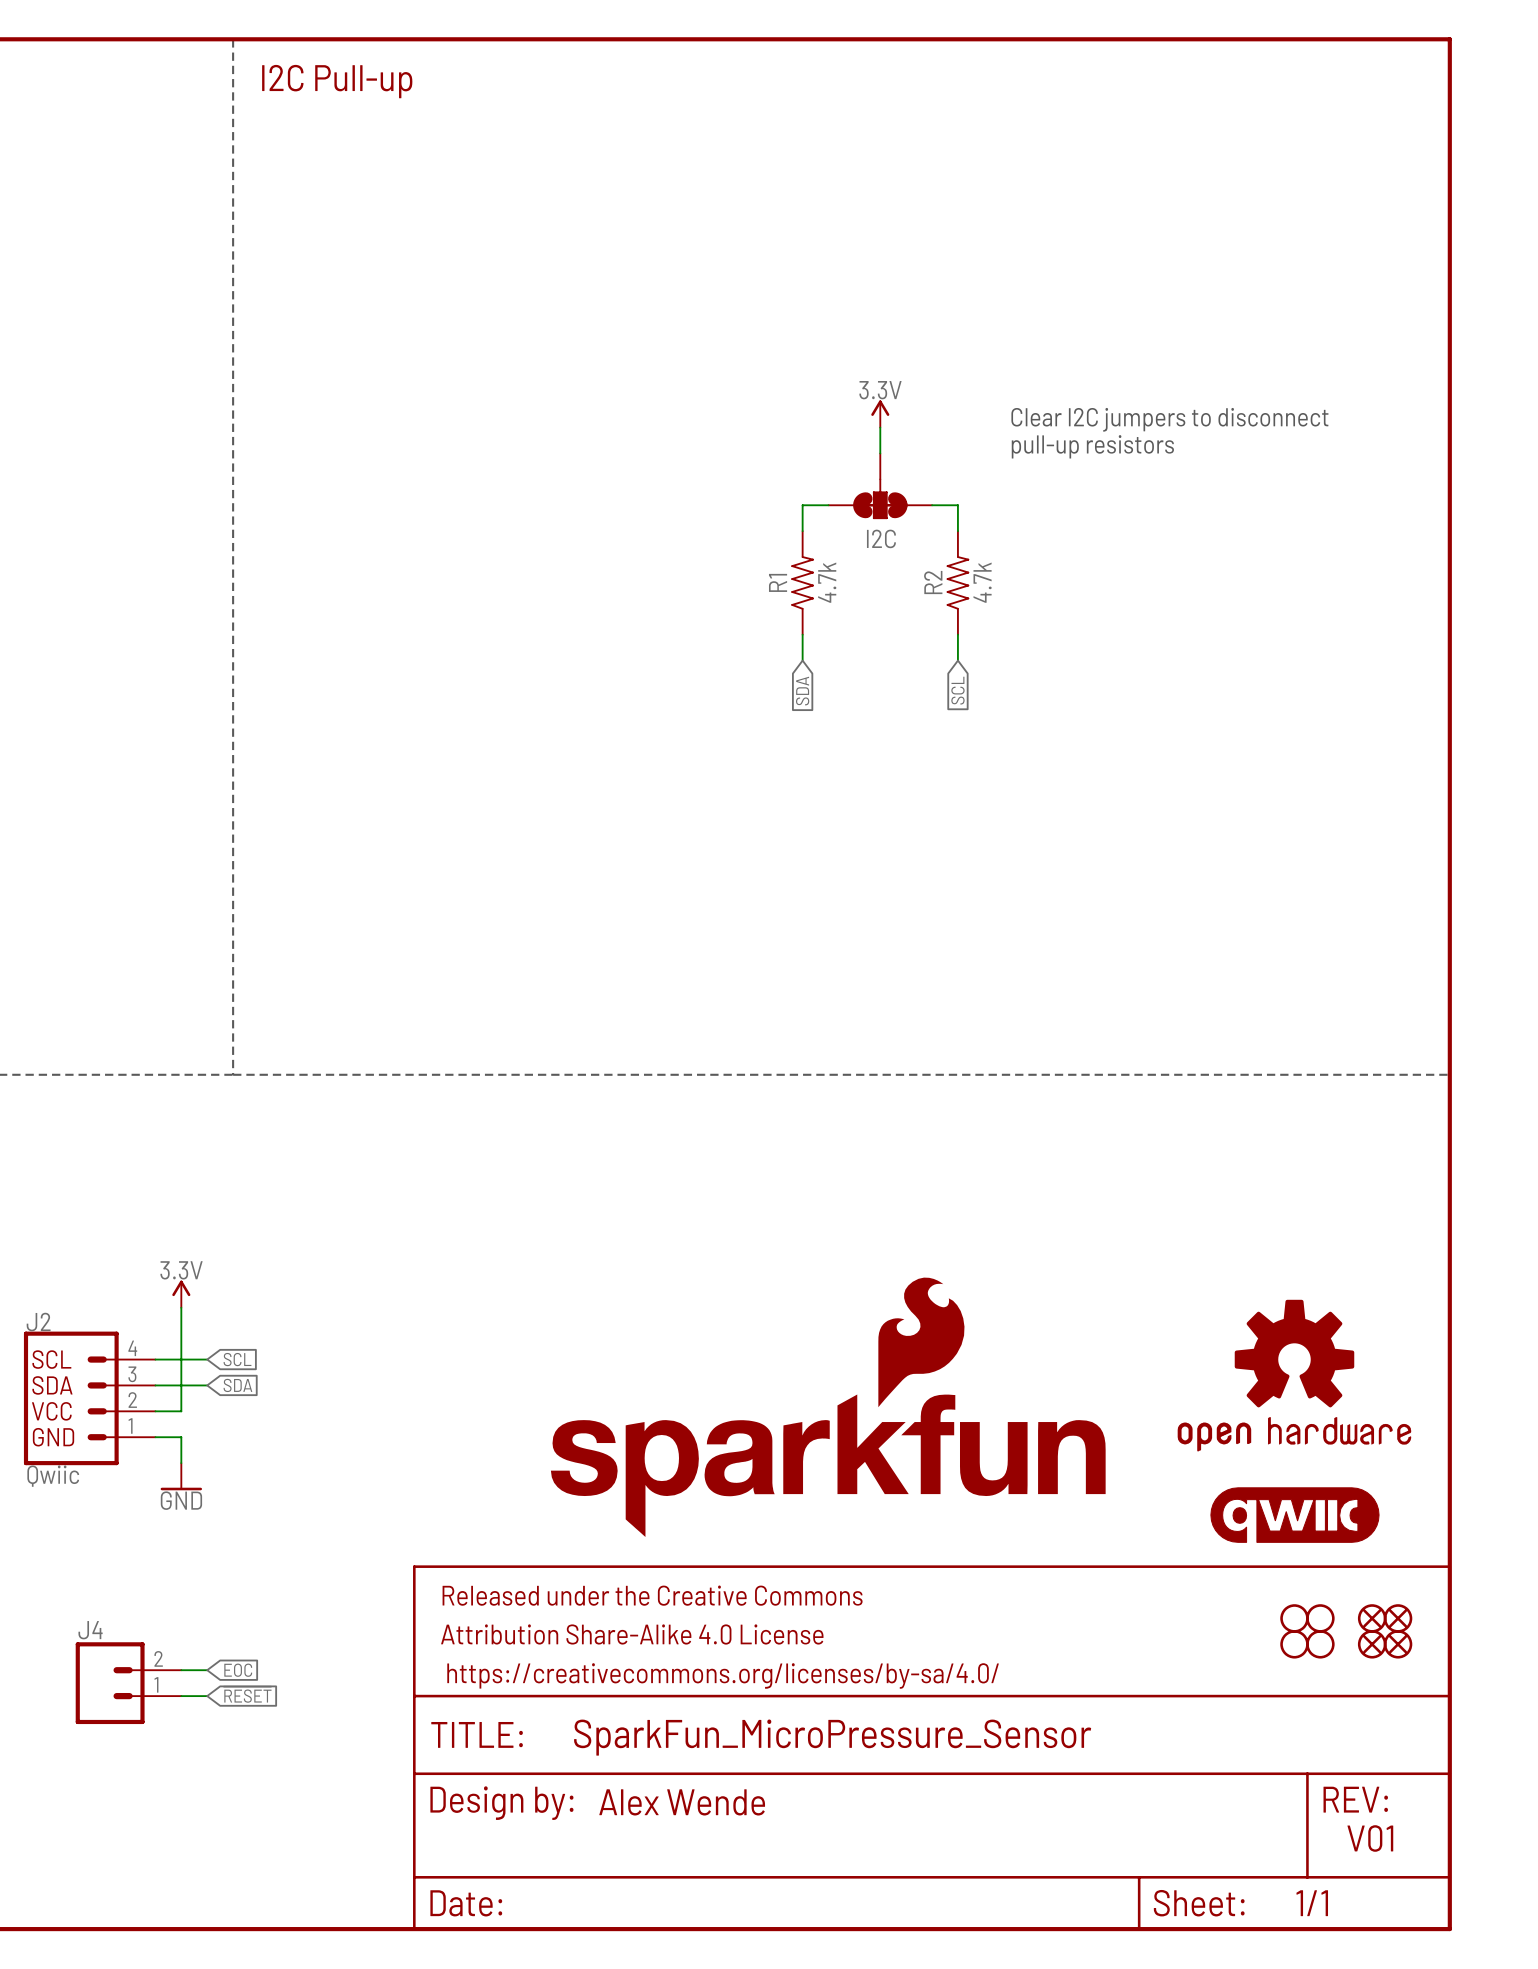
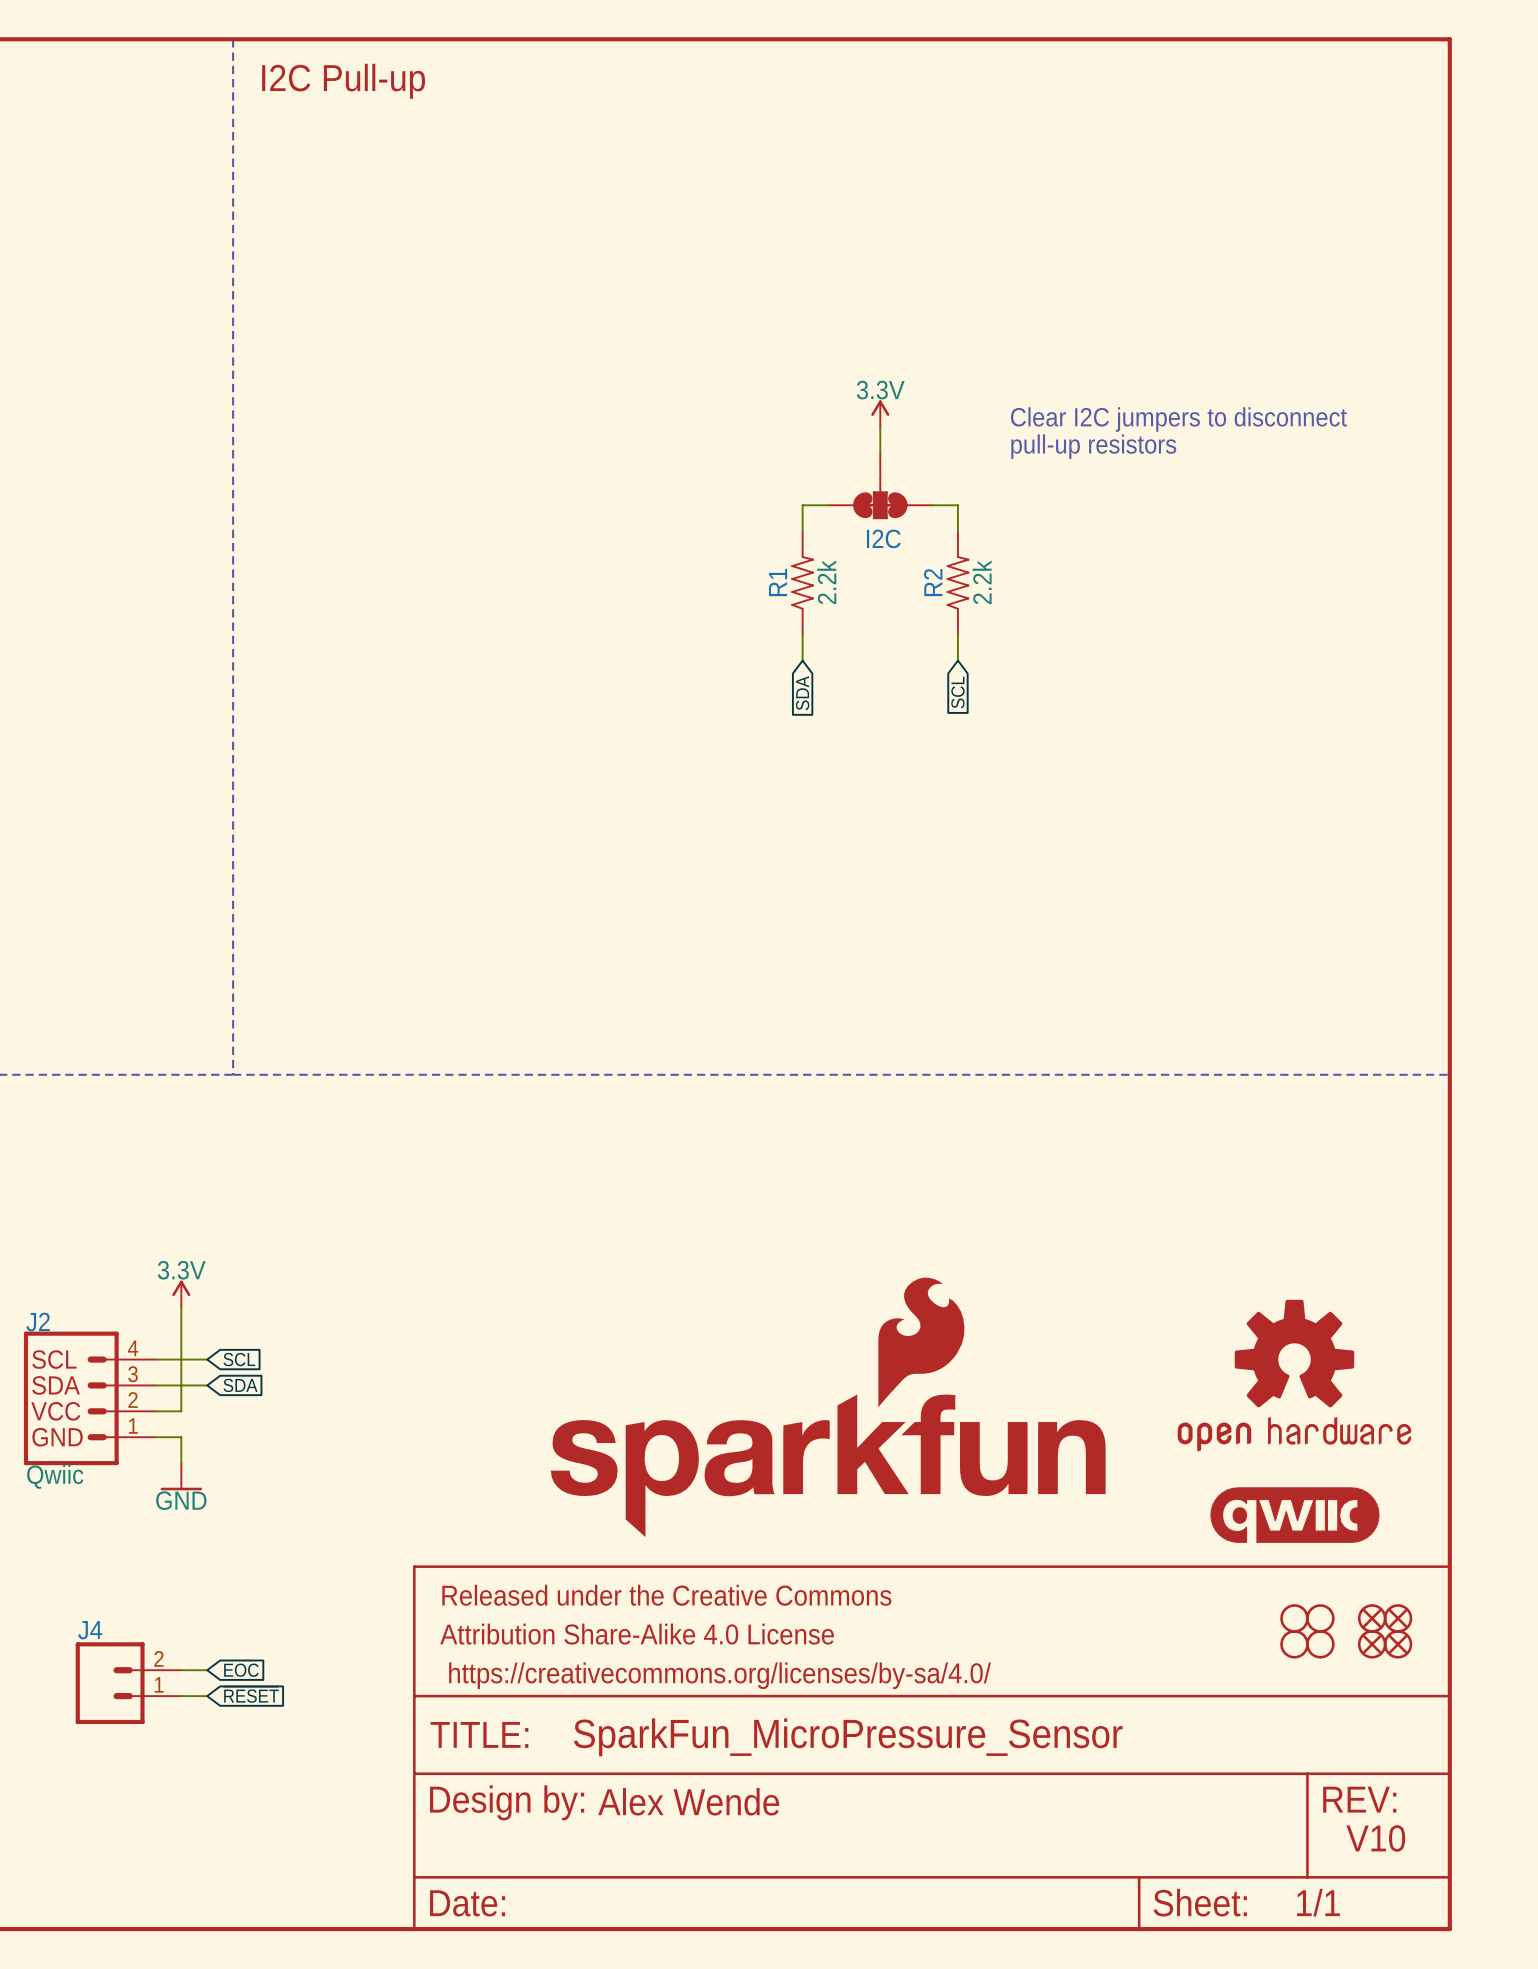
R1 value: 4.7k (827, 582) -> 2.2k (826, 582)
R2 value: 4.7k (982, 582) -> 2.2k (982, 582)
text: V01 (1370, 1838) -> V10 (1375, 1838)

